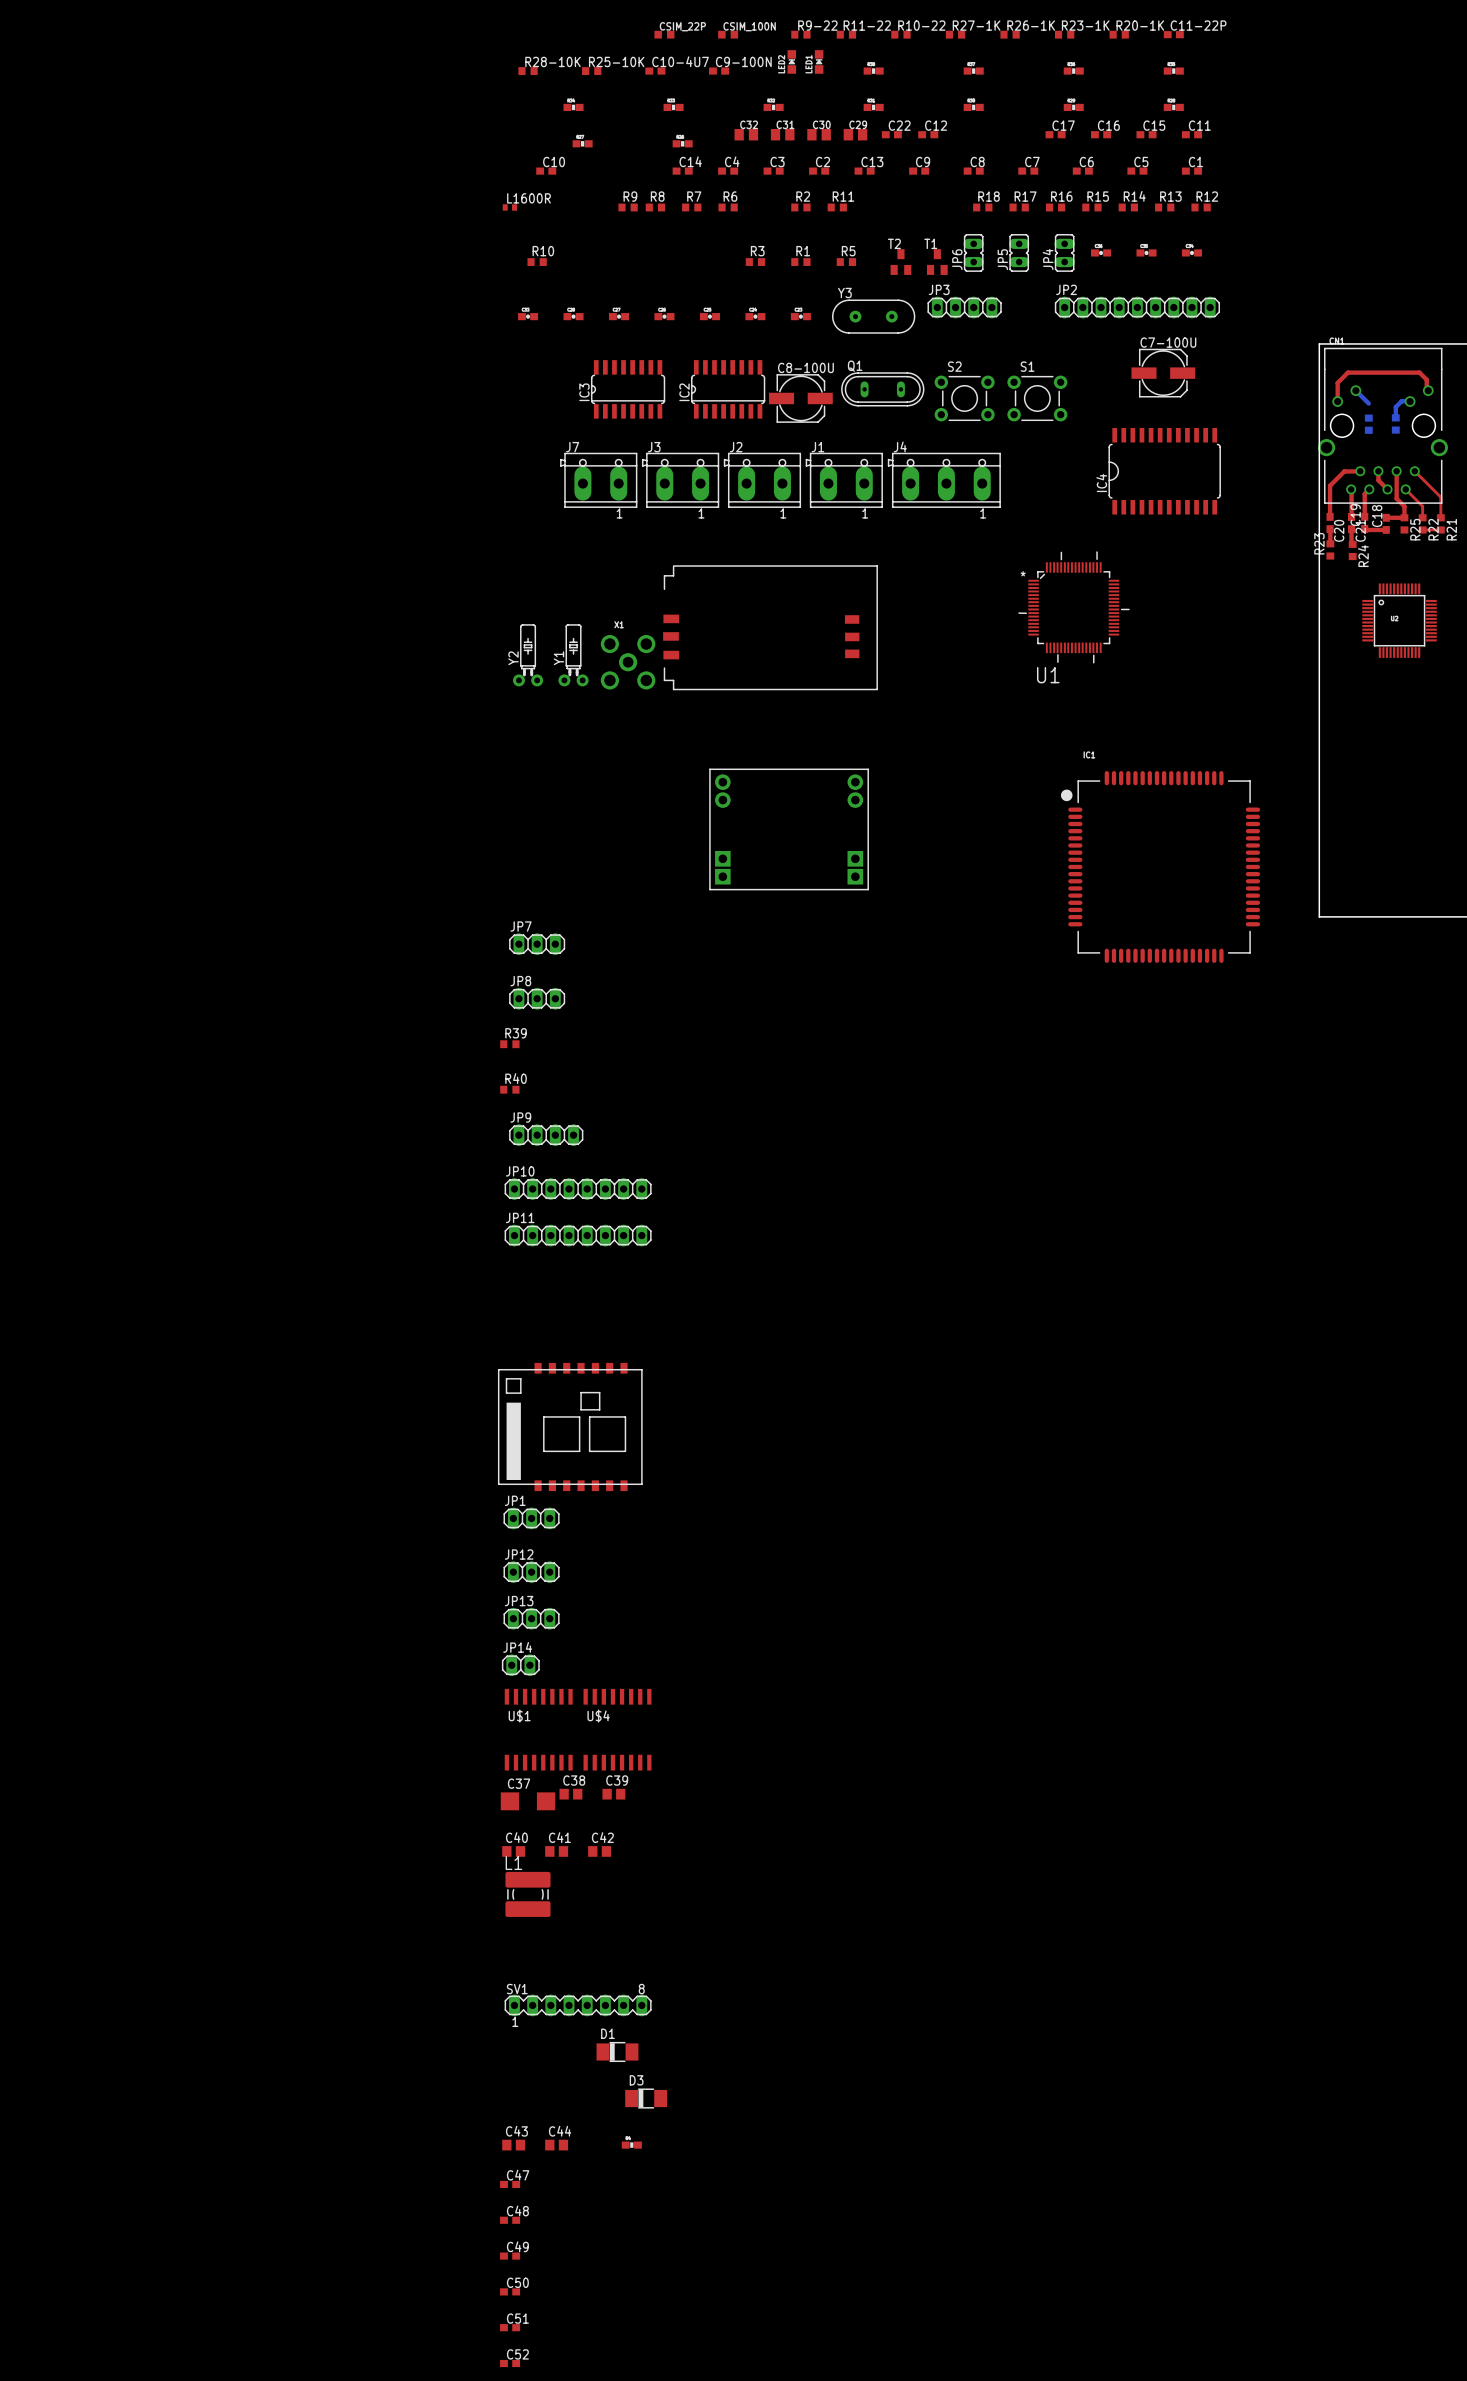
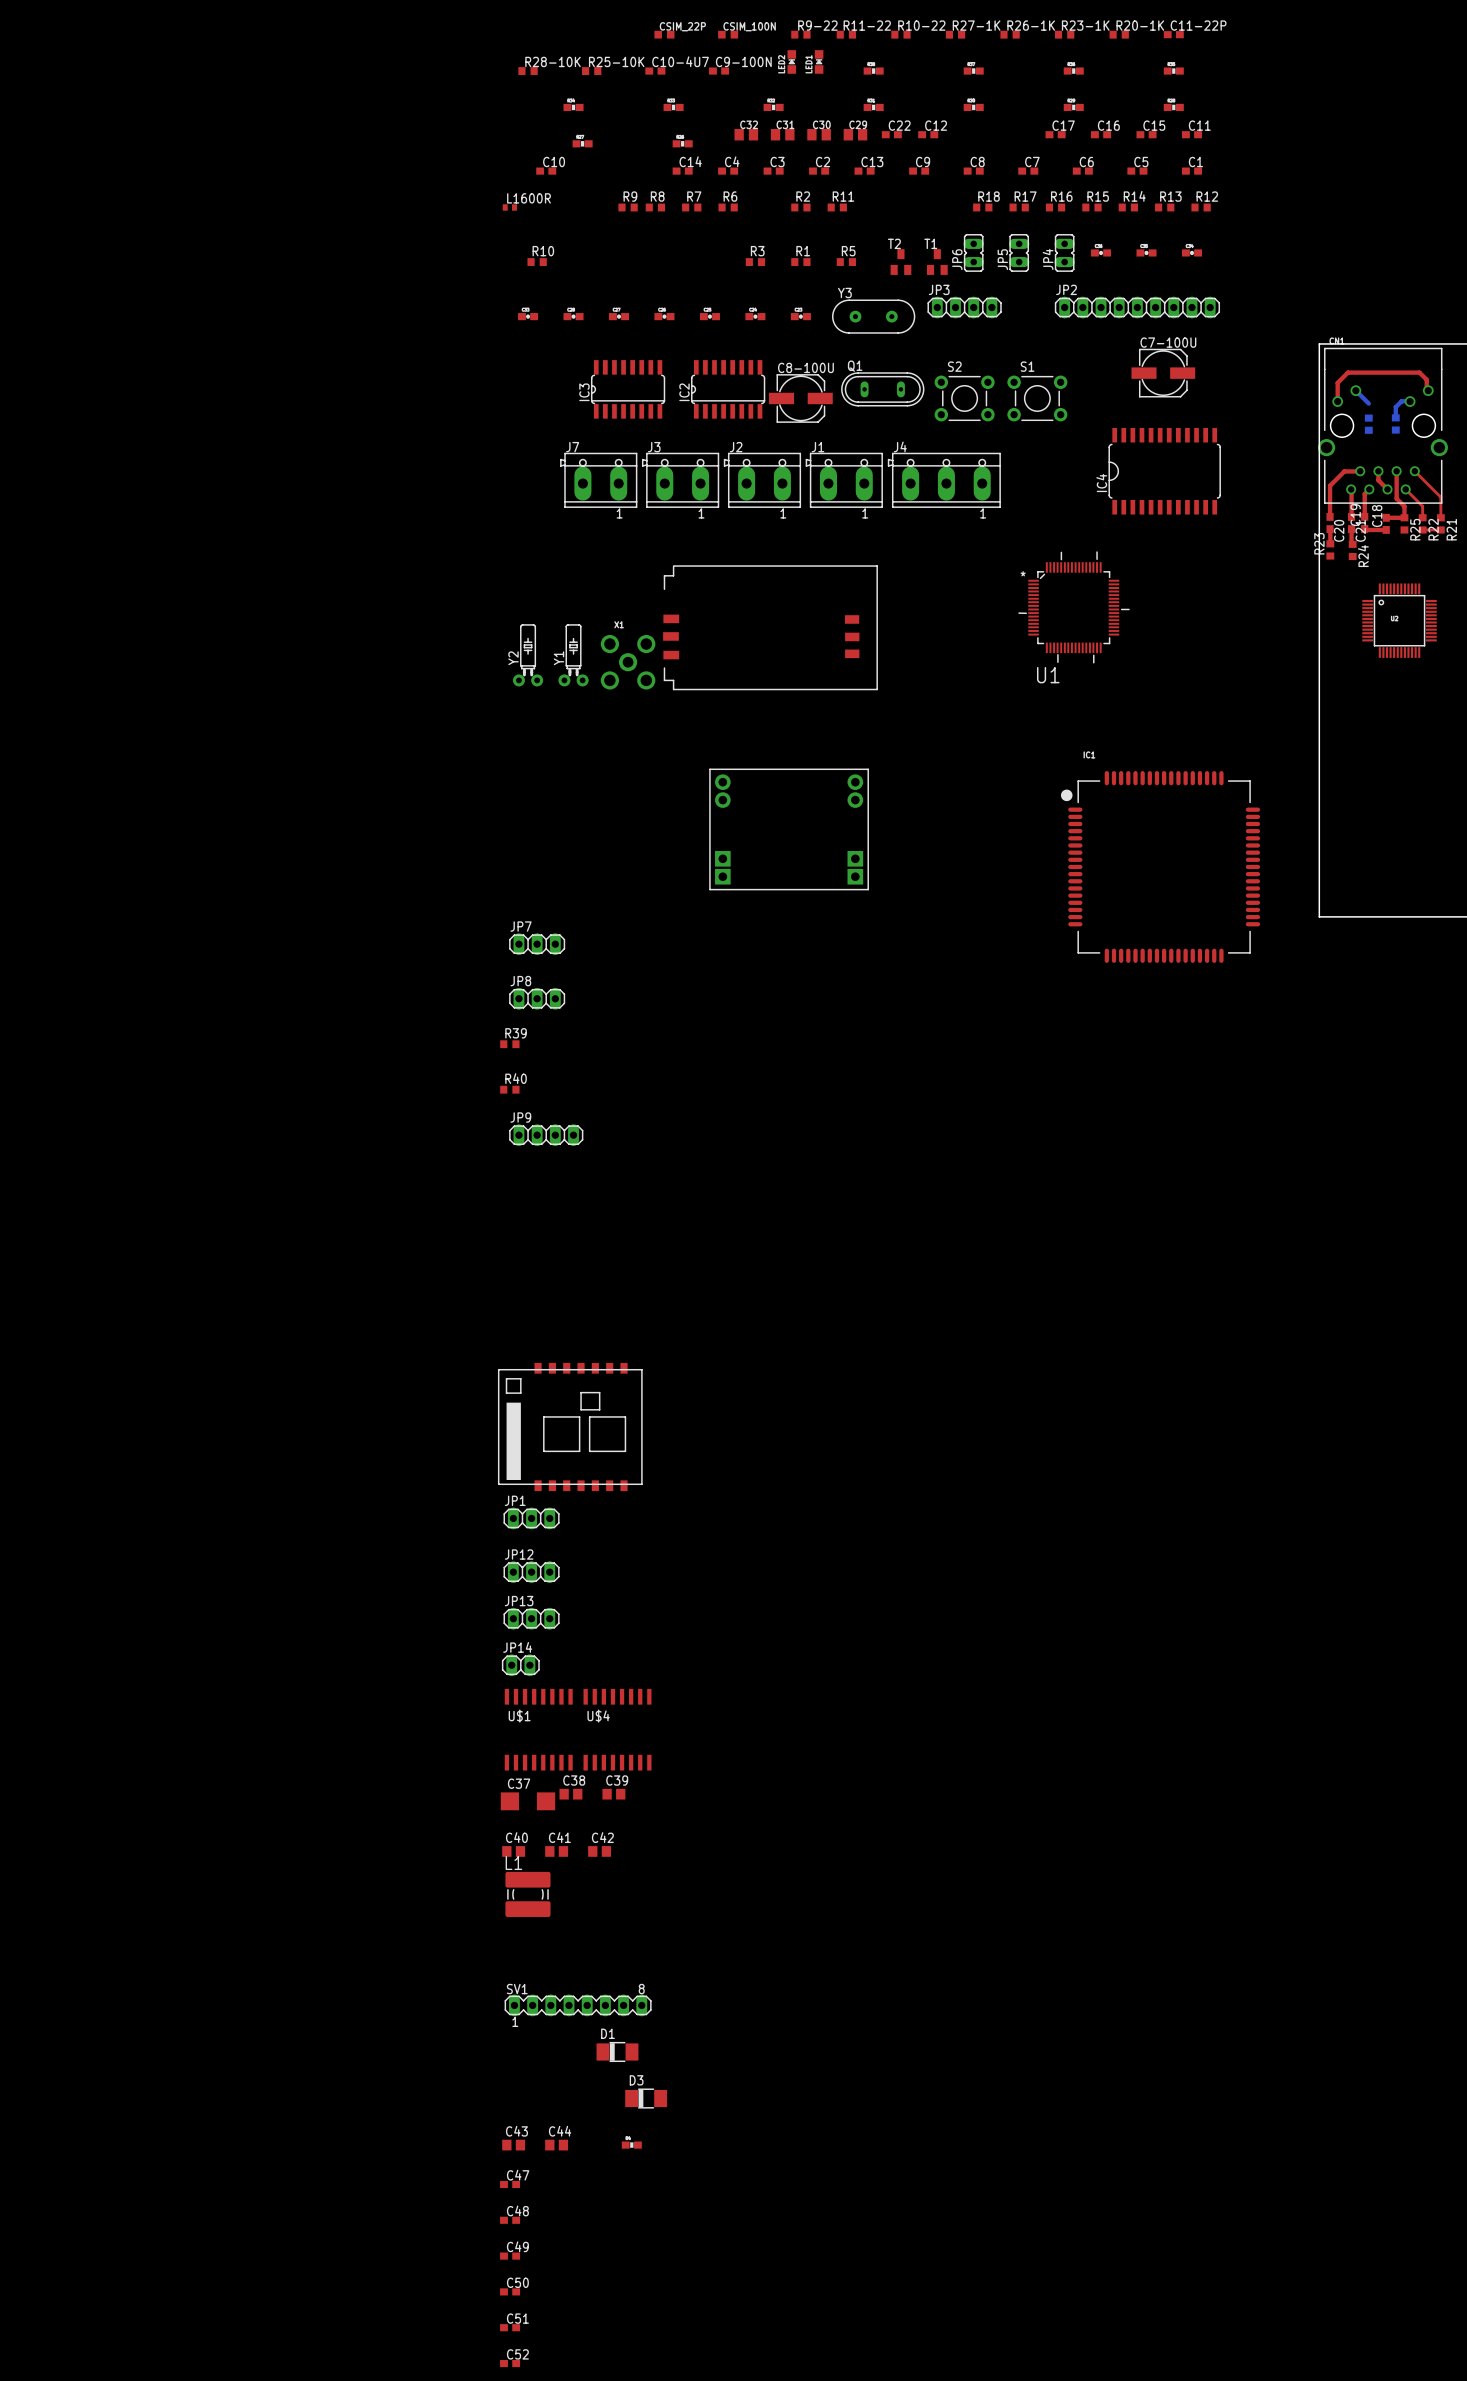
JP10: (578, 1189) -> none
JP11: (578, 1235) -> none

